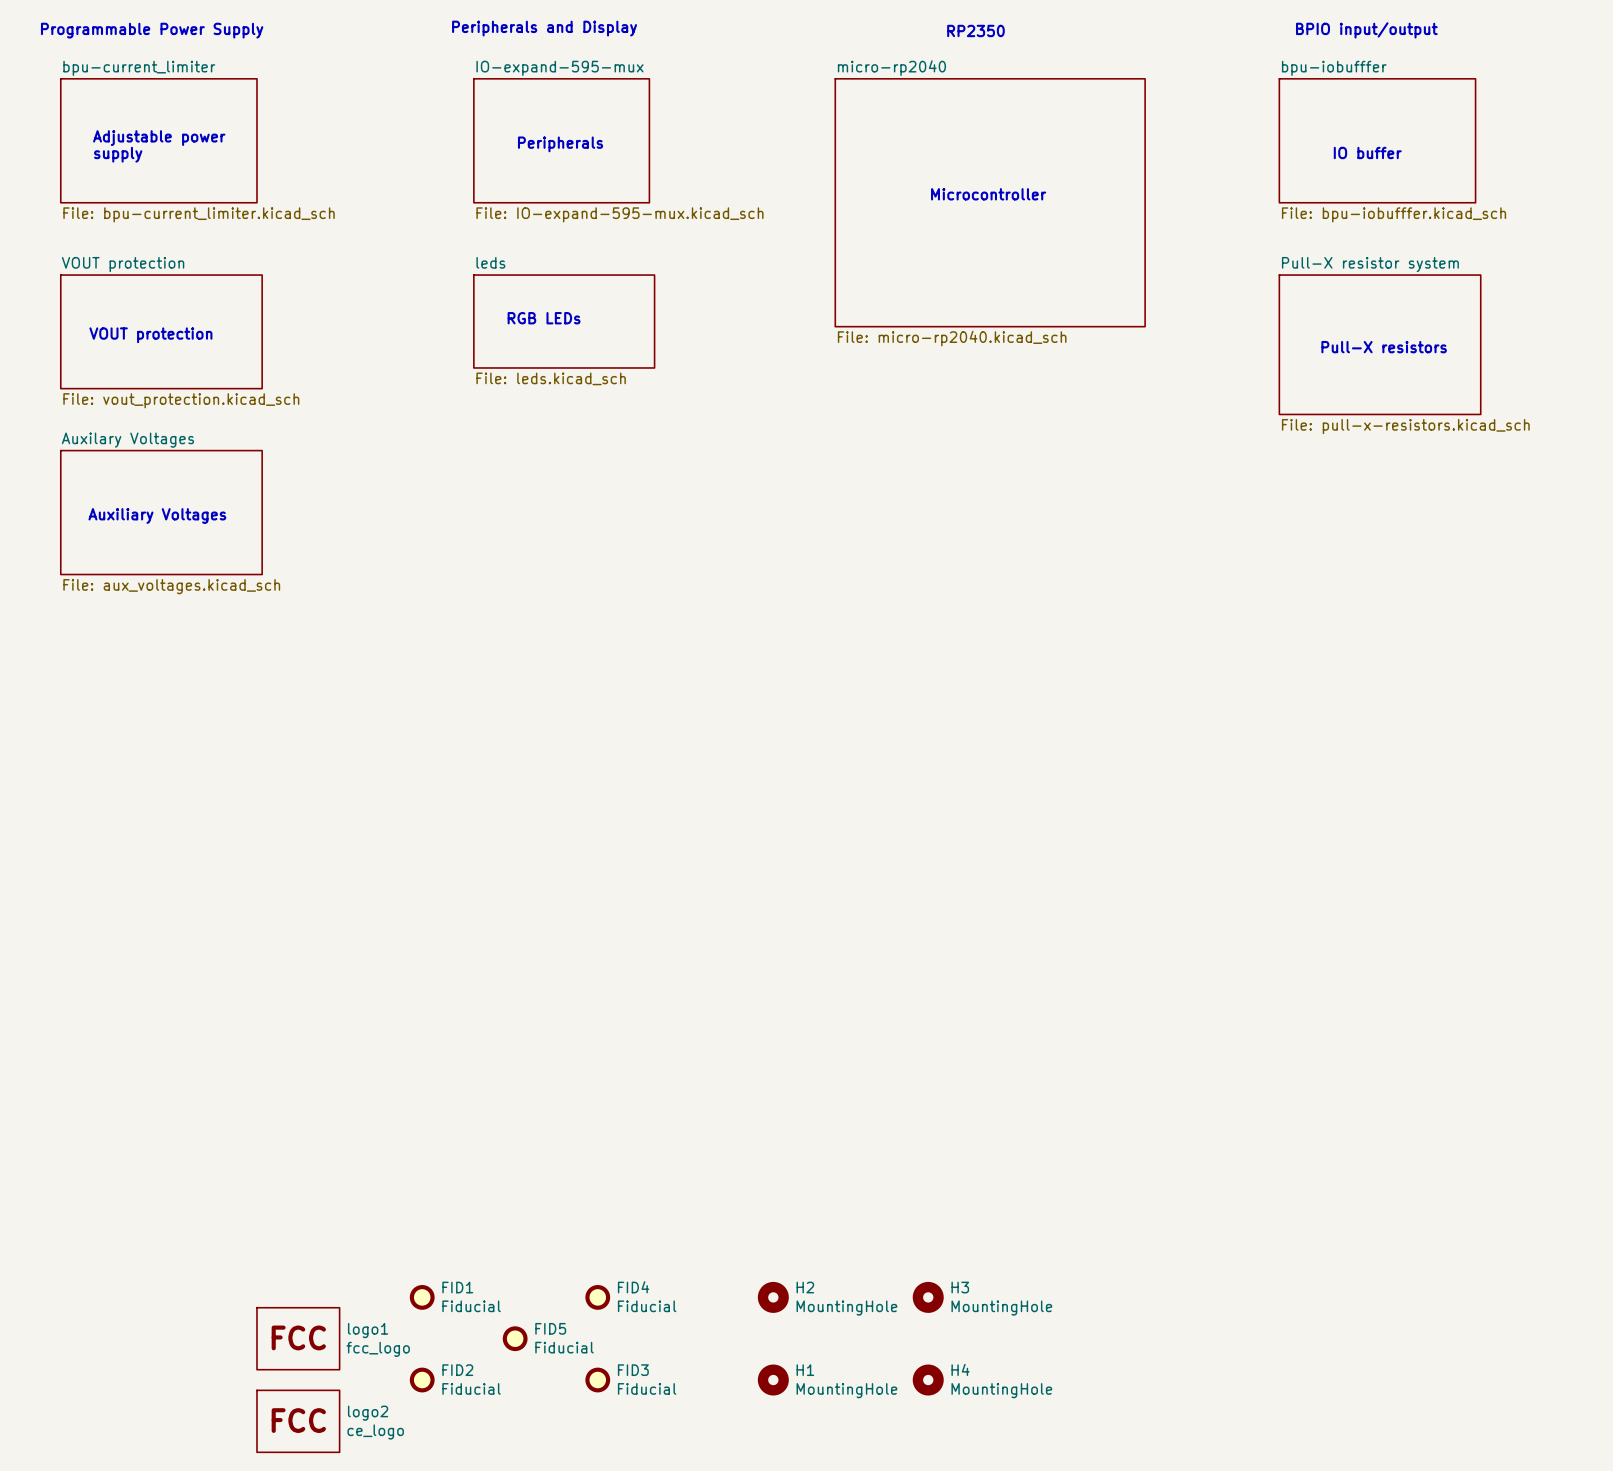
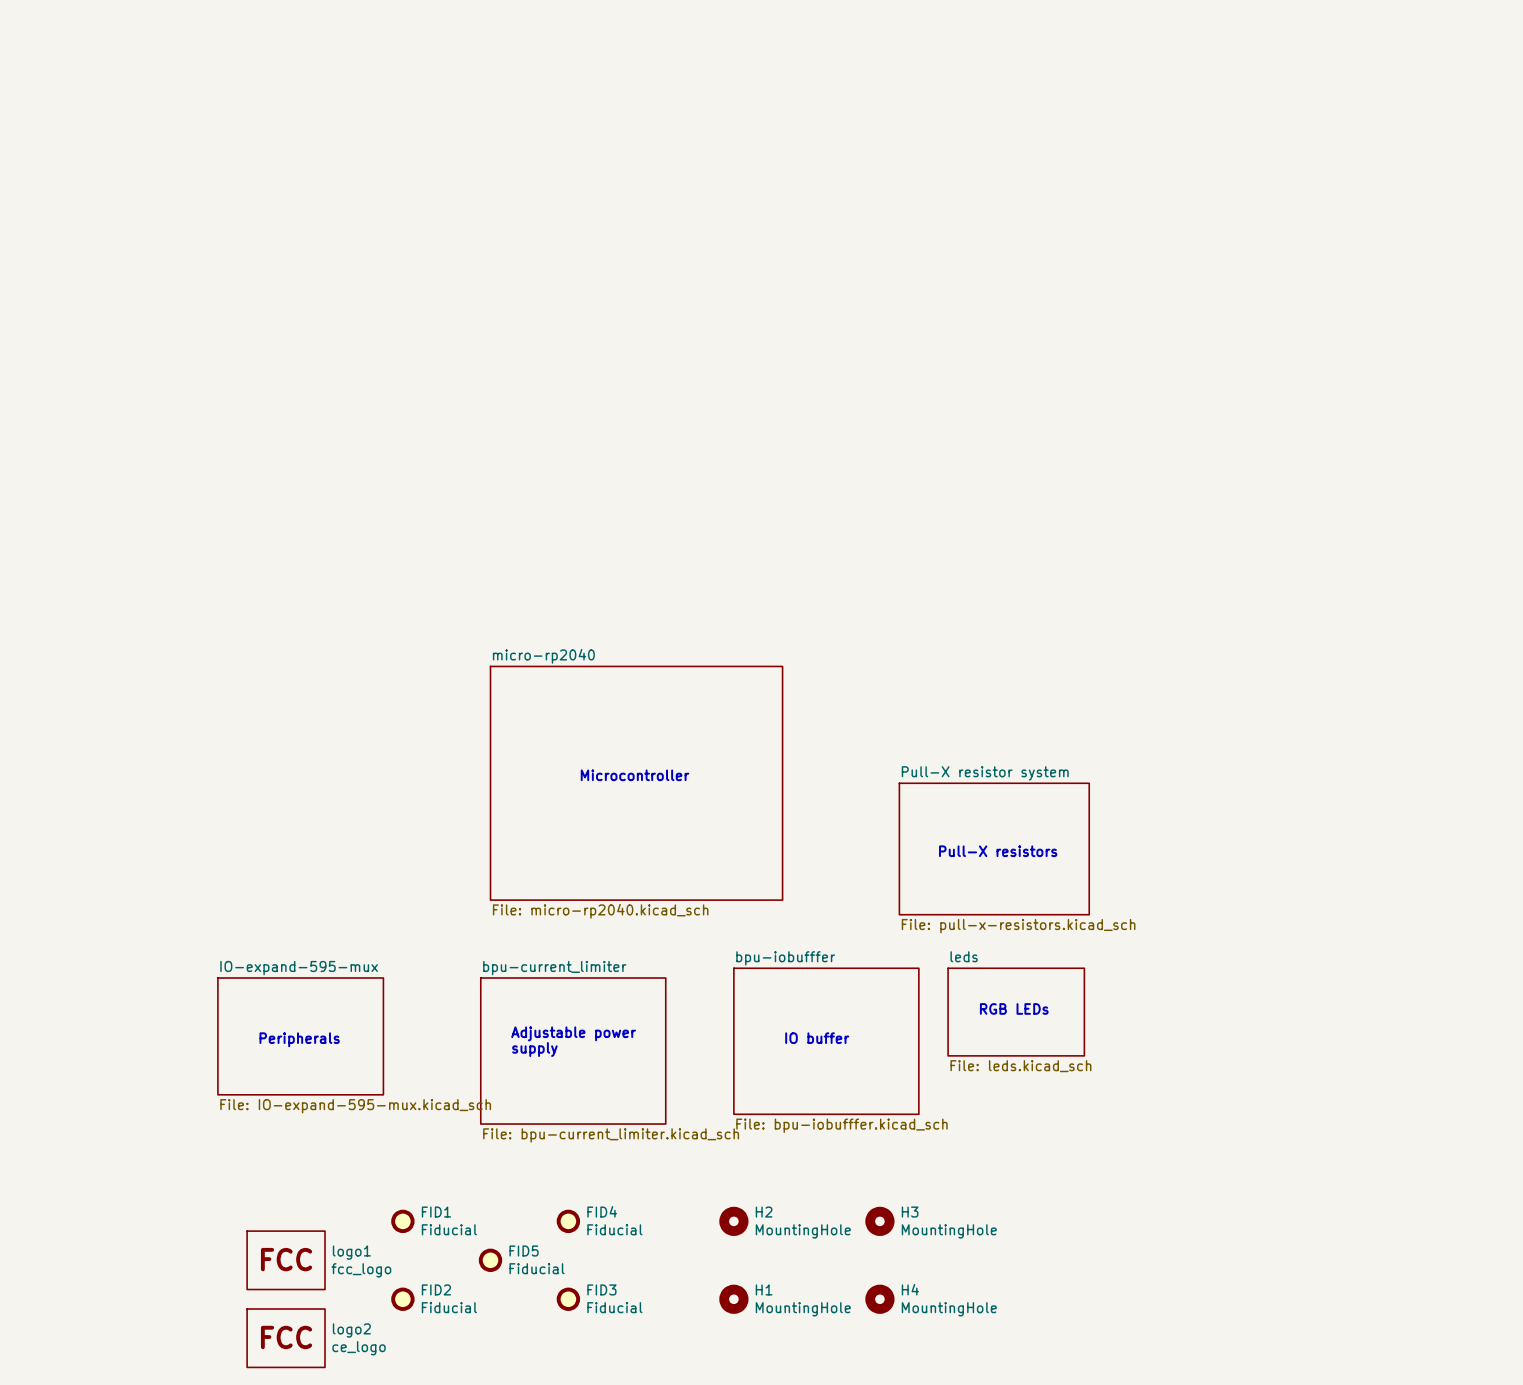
text: Peripherals and Display (544, 28) -> none
text: Programmable Power Supply (152, 30) -> none
text: RP2350 (975, 30) -> none
text: BPIO input/output (1366, 30) -> none
text: Adjustable power (159, 138) -> none
sheet bpu-current_limiter: File: bpu-current_limiter.kicad_sch (158, 140) -> none
sheet IO-expand-595-mux position: (561, 140) -> (300, 1036)
sheet bpu-iobufffer: File: bpu-iobufffer.kicad_sch (1377, 140) -> none
text: Peripherals (560, 144) -> none
text: IO buffer (1367, 152) -> none
text: supply (118, 154) -> none
text: Microcontroller (988, 194) -> none
sheet micro-rp2040 position: (990, 202) -> (636, 783)
text: RGB LEDs (544, 318) -> none
sheet leds: File: leds.kicad_sch (564, 321) -> none
sheet VOUT protection: File: vout_protection.kicad_sch (161, 331) -> none
text: VOUT protection (150, 335) -> none
sheet Pull-X resistor system: File: pull-x-resistors.kicad_sch (1380, 344) -> none
text: Pull-X resistors (1384, 347) -> none
sheet Auxilary Voltages: File: aux_voltages.kicad_sch (161, 512) -> none
text: Auxiliary Voltages (157, 515) -> none
text: none -> Microcontroller (635, 775)
sheet Pull-X resistor system: none -> File: pull-x-resistors.kicad_sch (994, 848)
text: none -> Pull-X resistors (998, 851)
text: none -> RGB LEDs (1014, 1008)
sheet leds: none -> File: leds.kicad_sch (1016, 1012)
text: none -> Adjustable power (573, 1033)
text: none -> IO buffer (817, 1038)
text: none -> Peripherals (299, 1039)
sheet bpu-iobufffer: none -> File: bpu-iobufffer.kicad_sch (826, 1041)
text: none -> supply (534, 1049)
sheet bpu-current_limiter: none -> File: bpu-current_limiter.kicad_sch (573, 1051)

